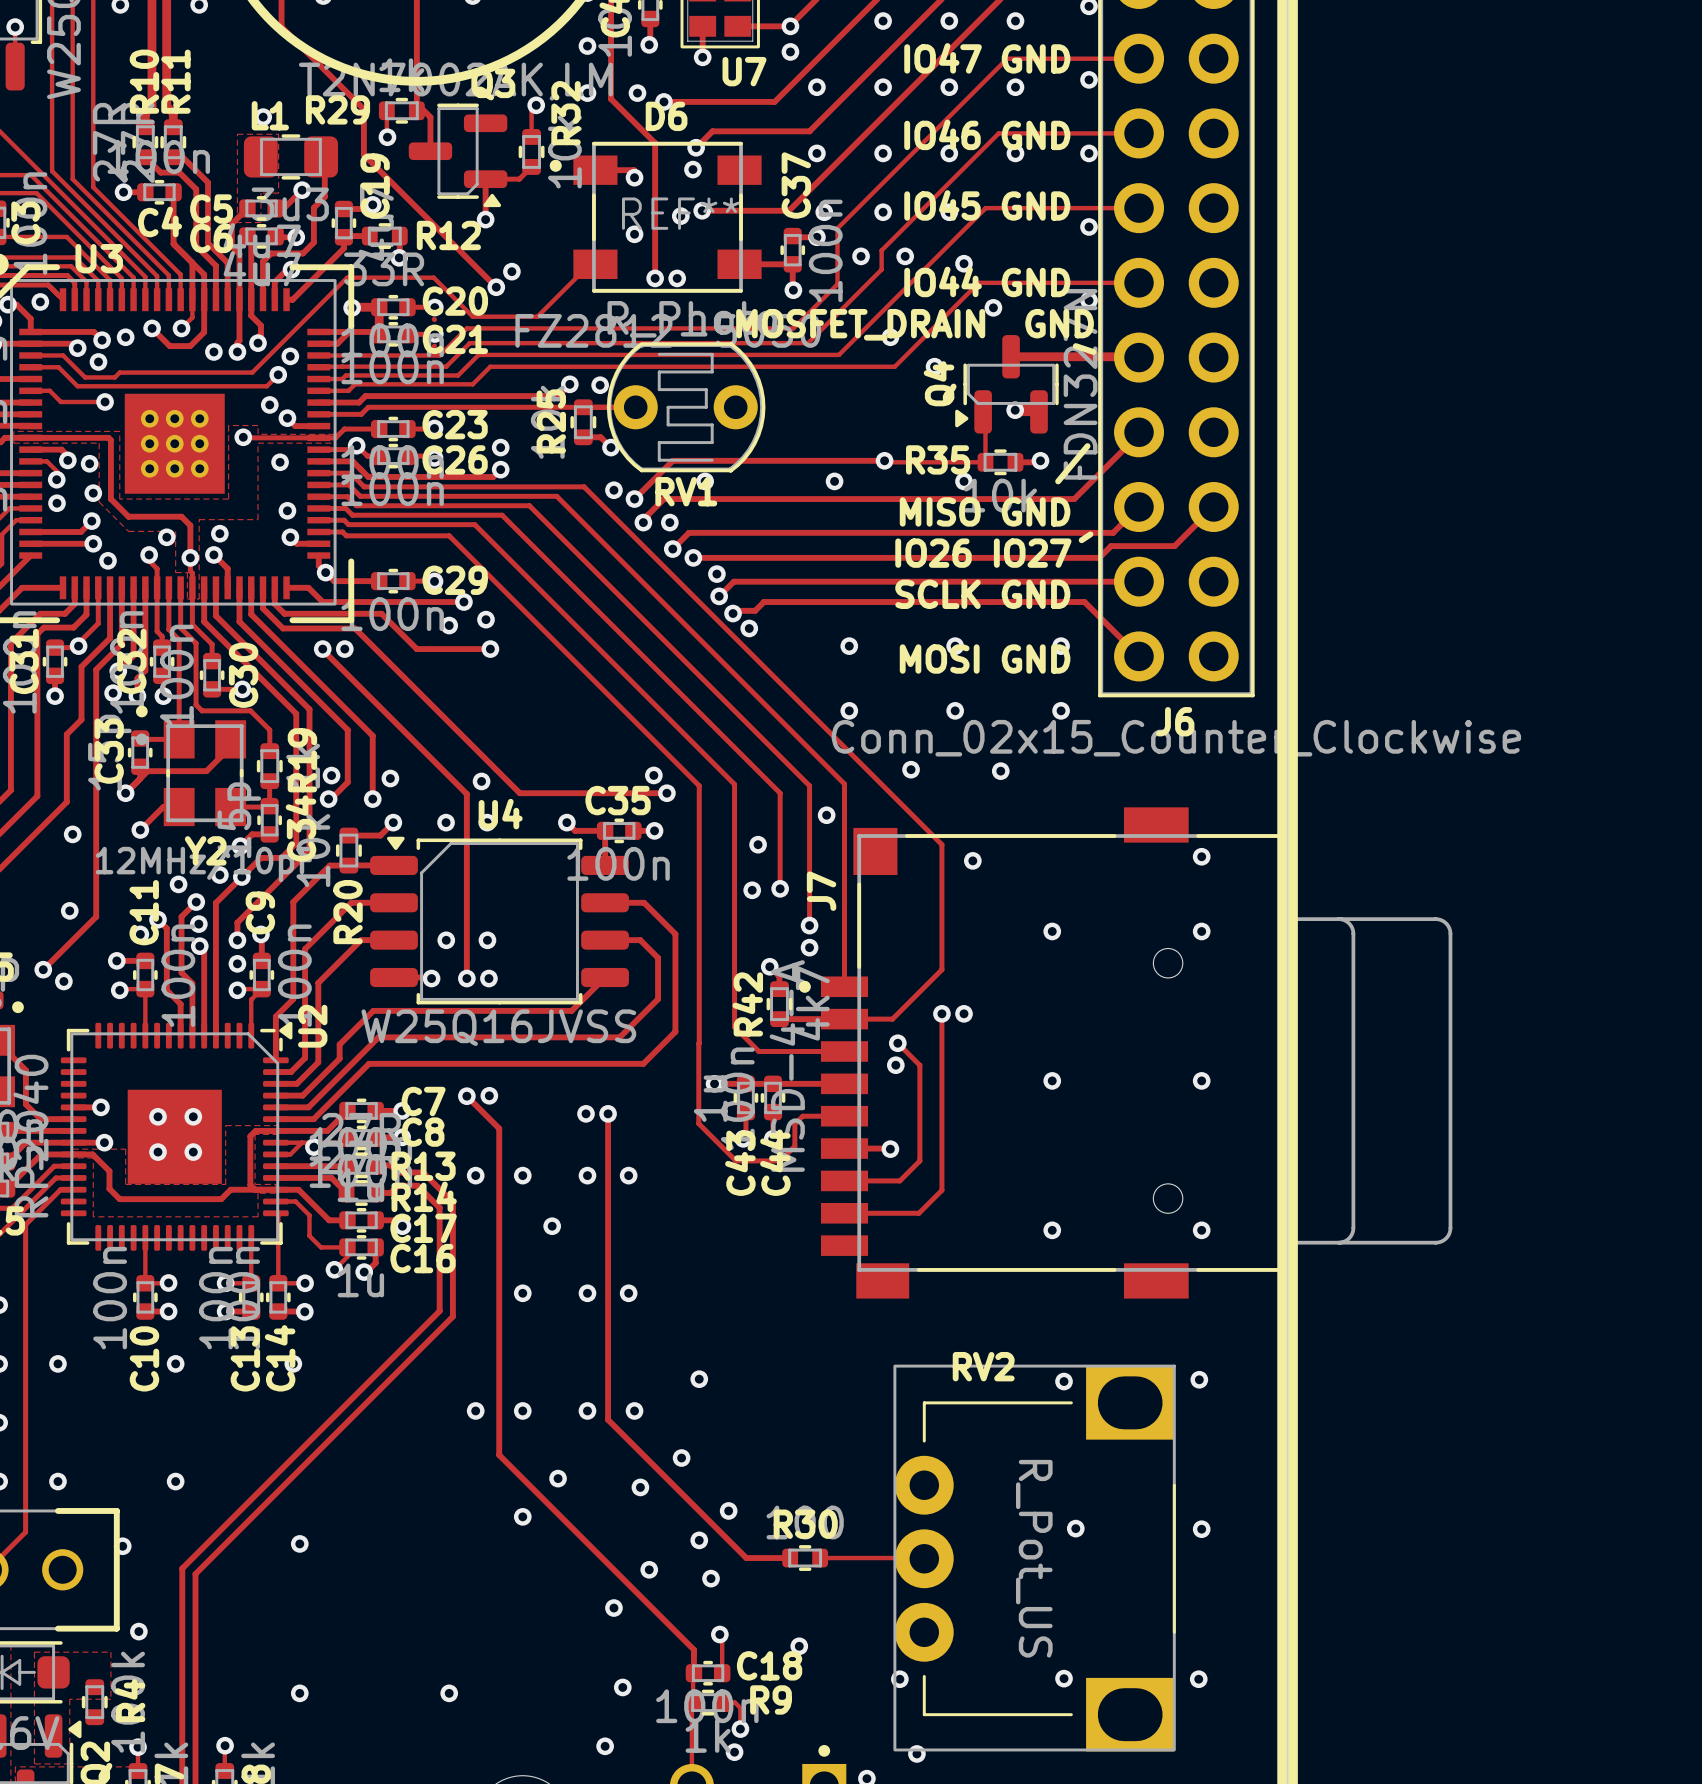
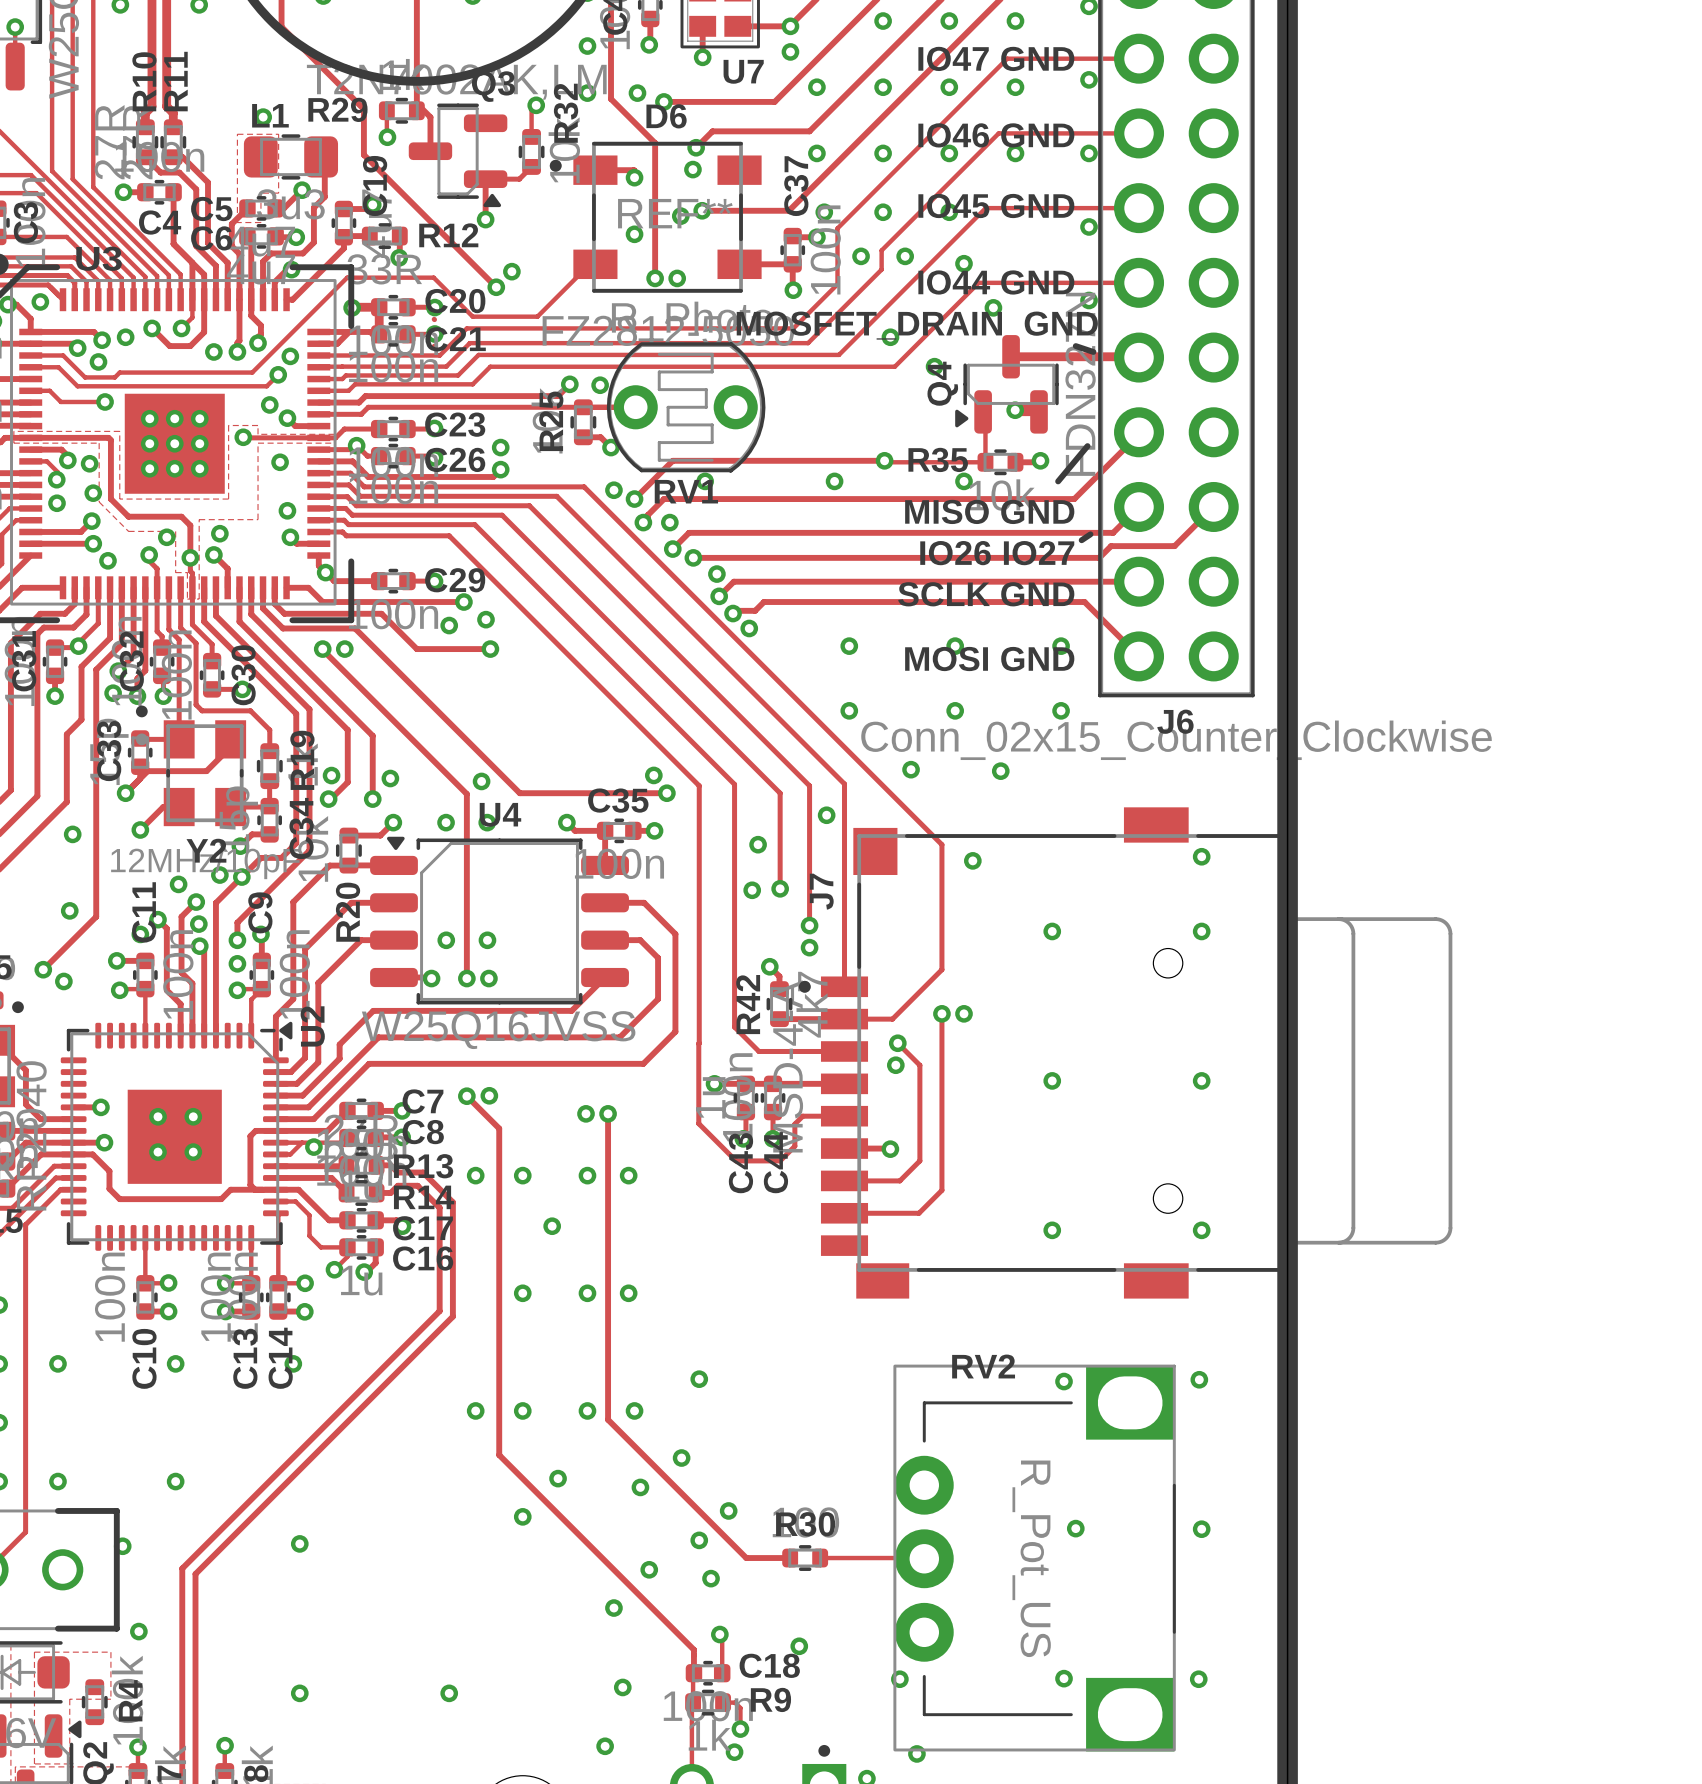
zone outline: (225, 1125) (225, 1184) (125, 1184) (125, 1149) (72, 1149) (72, 1157) (93, 1157) (93, 1216) (258, 1216) (258, 1193) (275, 1193) (275, 1184) (255, 1184) (255, 1134) (278, 1134) (278, 1125) (225, 1125) -> none

